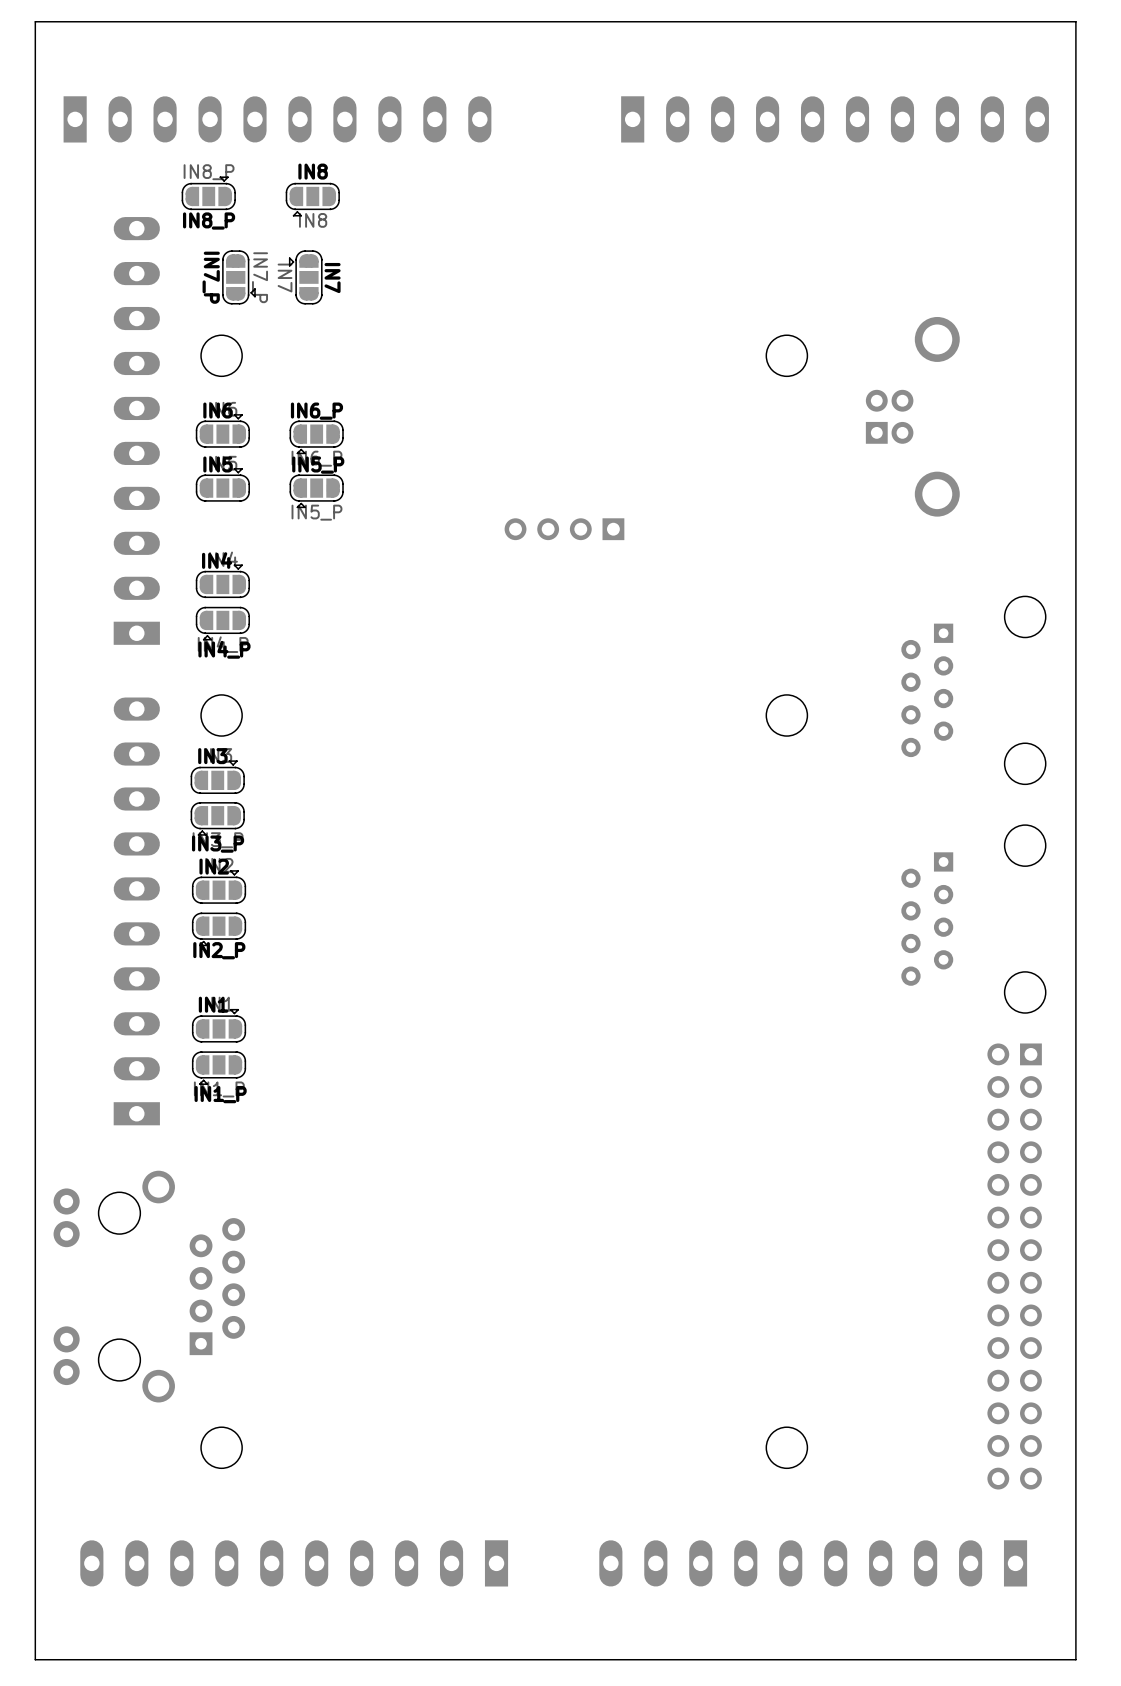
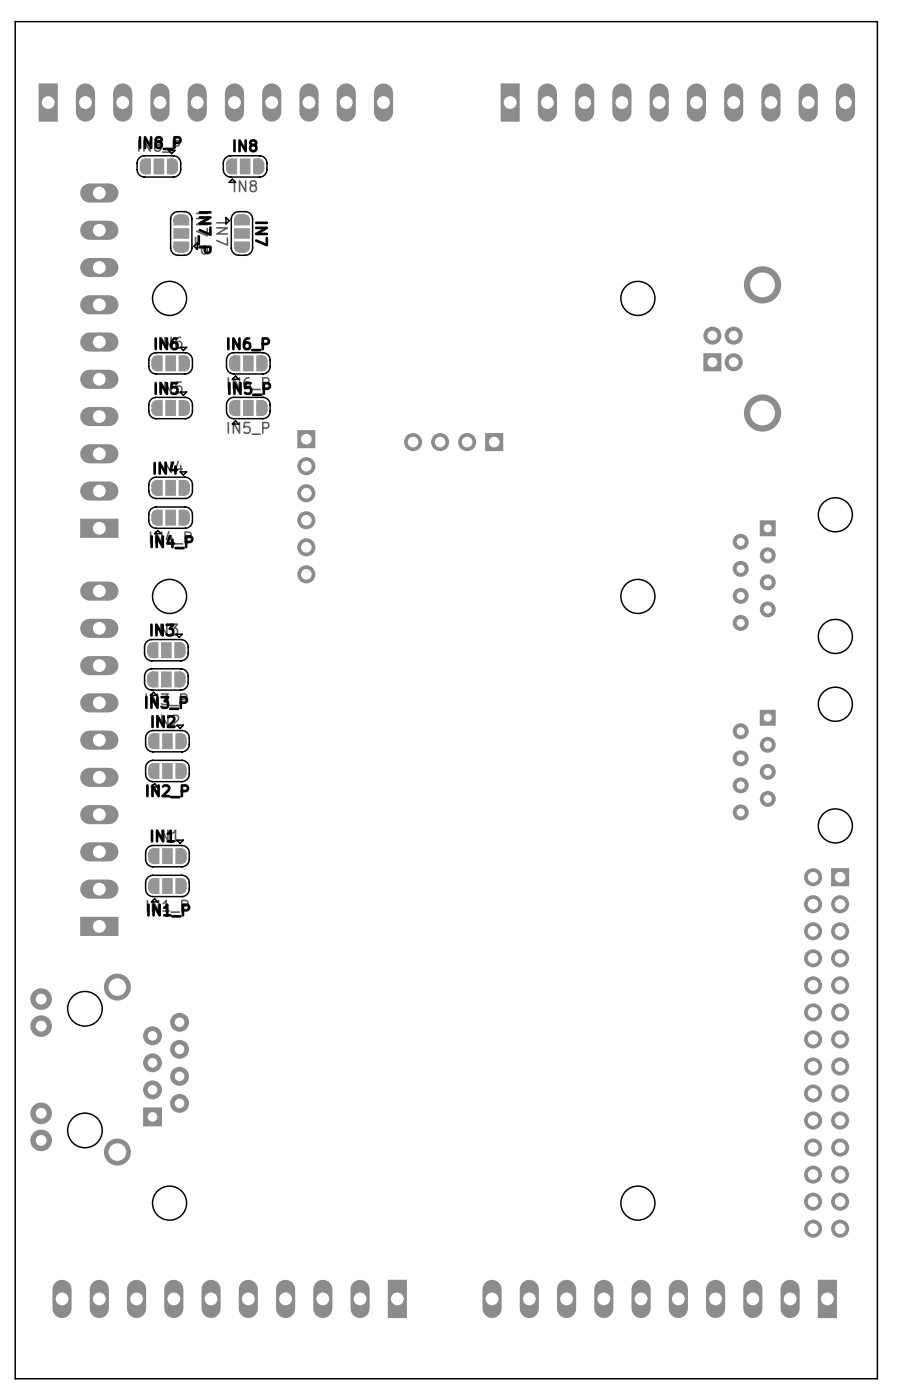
text position: IN8_P (209, 221) -> IN8_P (160, 143)
text position: IN7_P (211, 277) -> IN7_P (204, 232)
part: none -> (306, 506)

